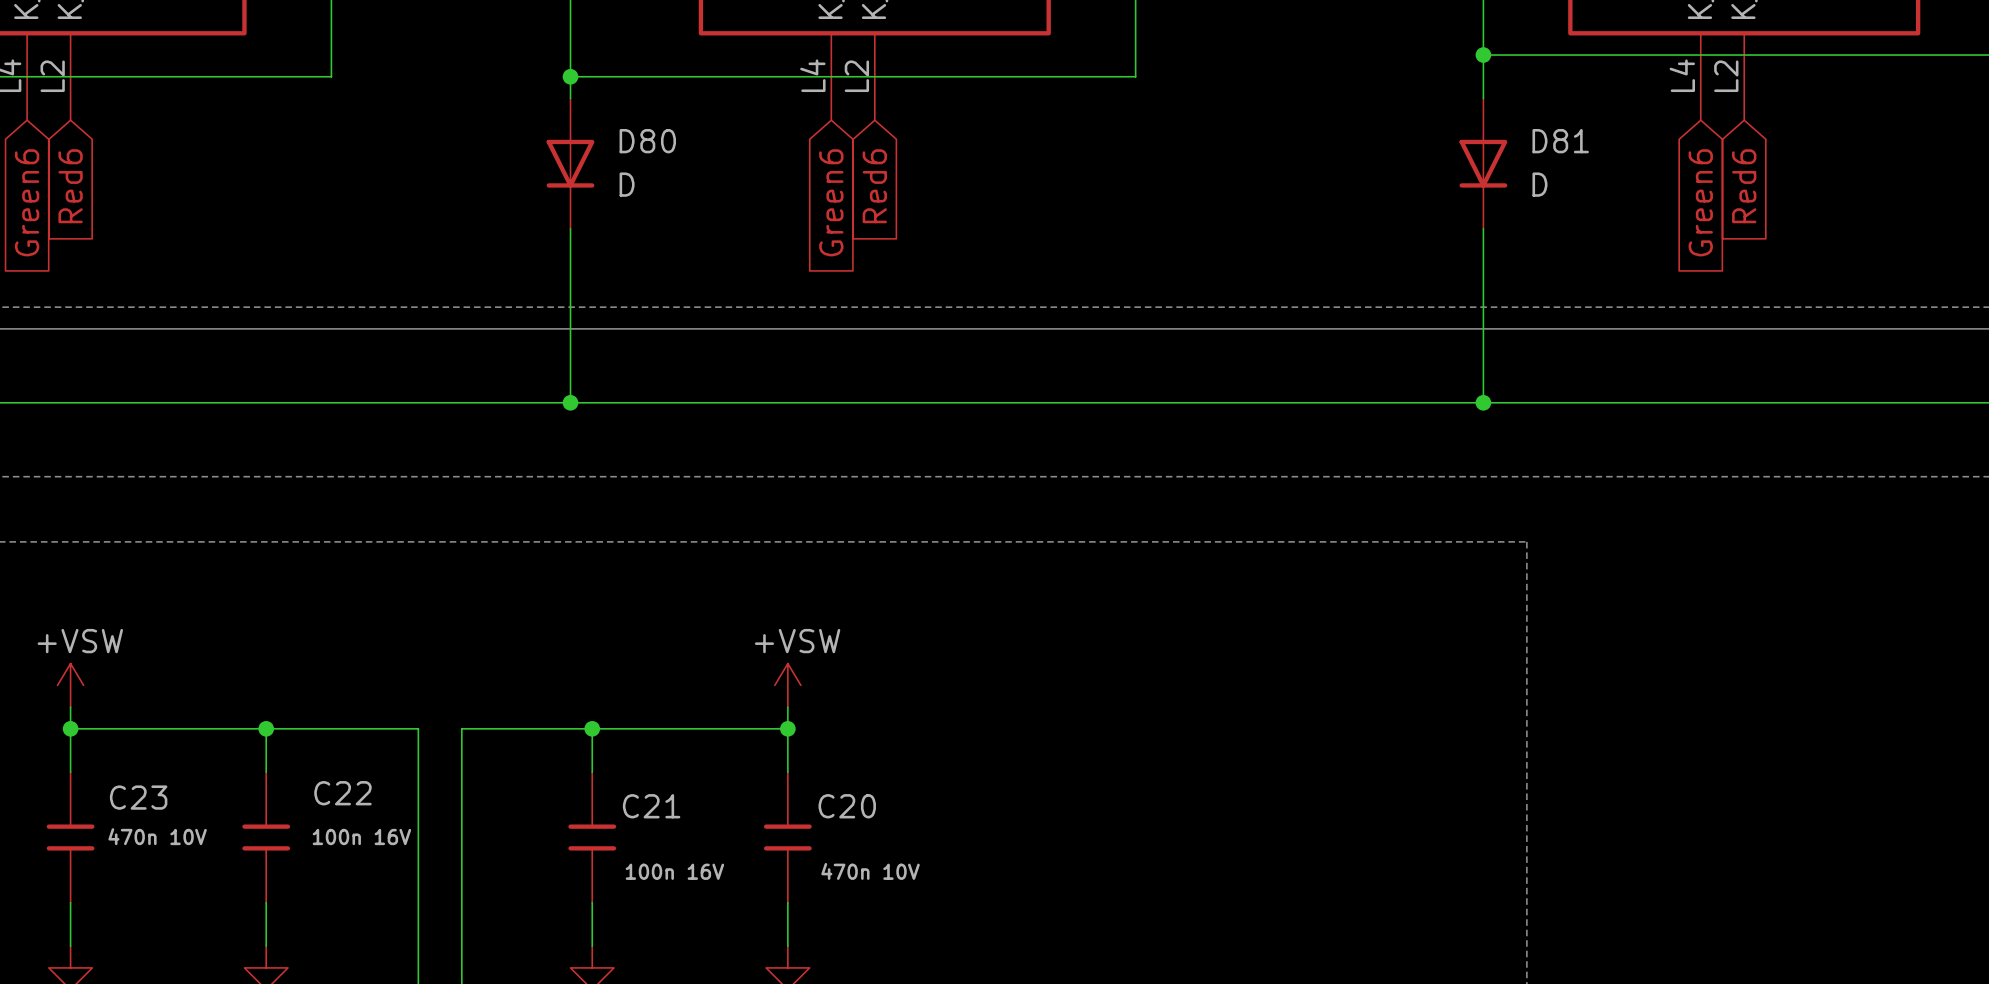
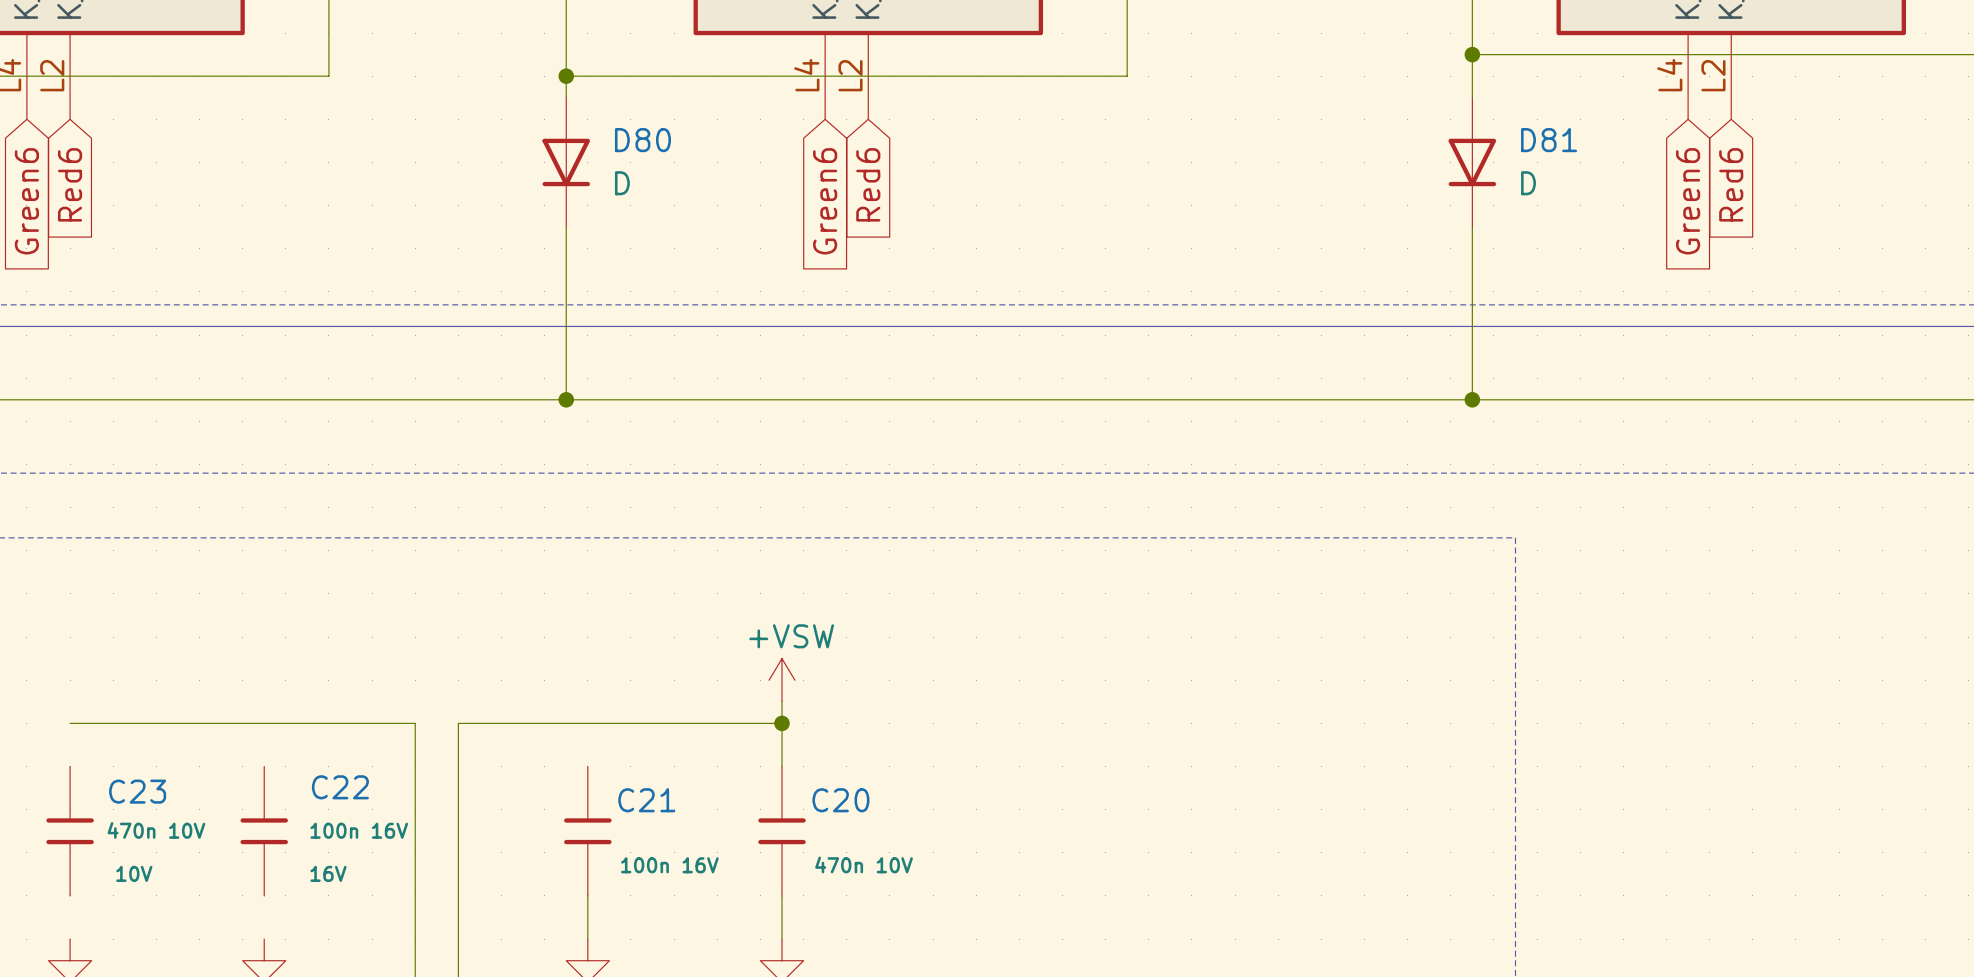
power symbol: +VSW (70, 685) -> none
wire: (70, 707) (70, 772) -> none
junction: (70, 728) -> none
wire: (266, 728) (266, 772) -> none
junction: (266, 728) -> none
wire: (592, 728) (592, 772) -> none
junction: (592, 728) -> none
C23 text: none -> 10V (134, 873)
C22 text: none -> 16V (328, 873)
wire: (70, 902) (70, 946) -> none
wire: (266, 902) (266, 946) -> none

